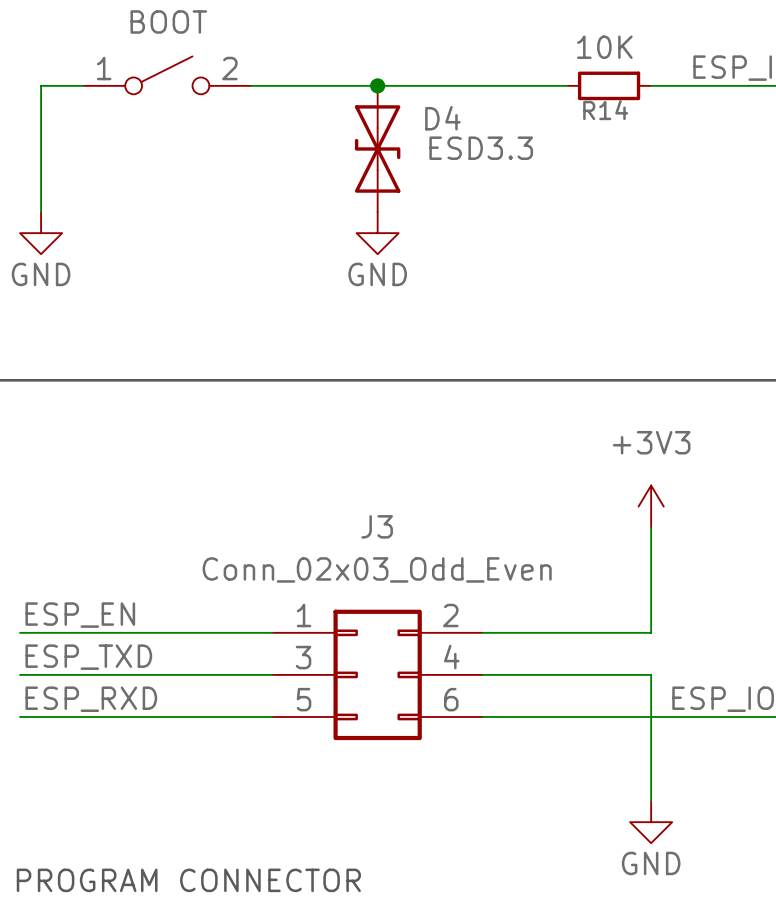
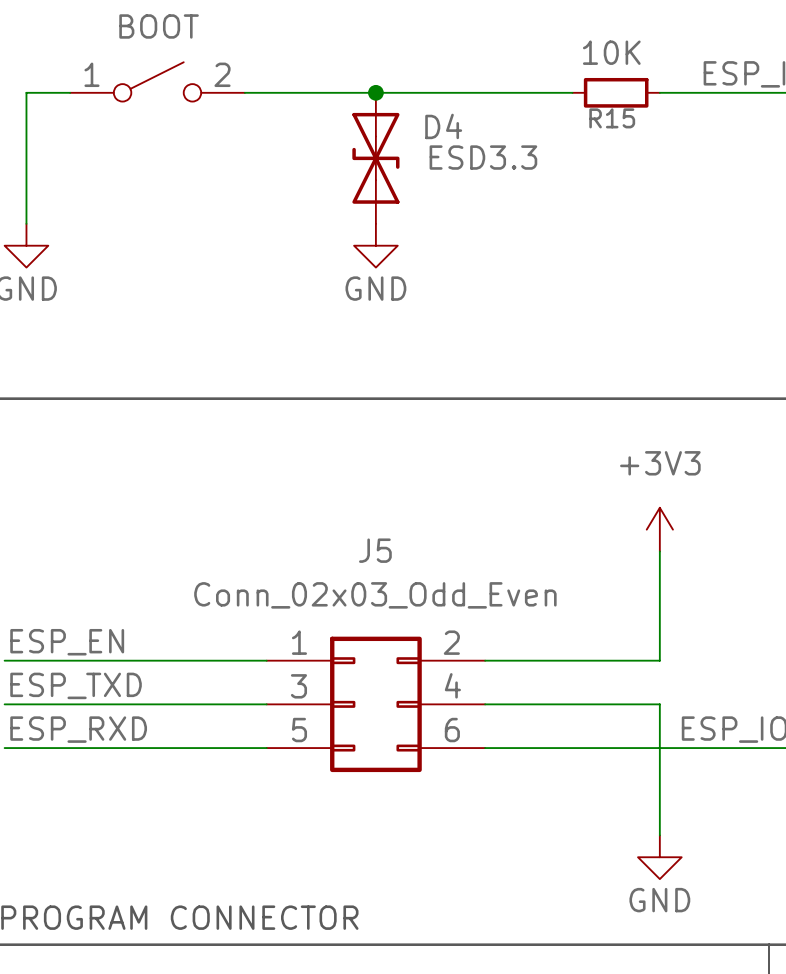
R14 name: R14 (605, 110) -> R15 (612, 118)
J3 name: J3 (377, 526) -> J5 (375, 550)

